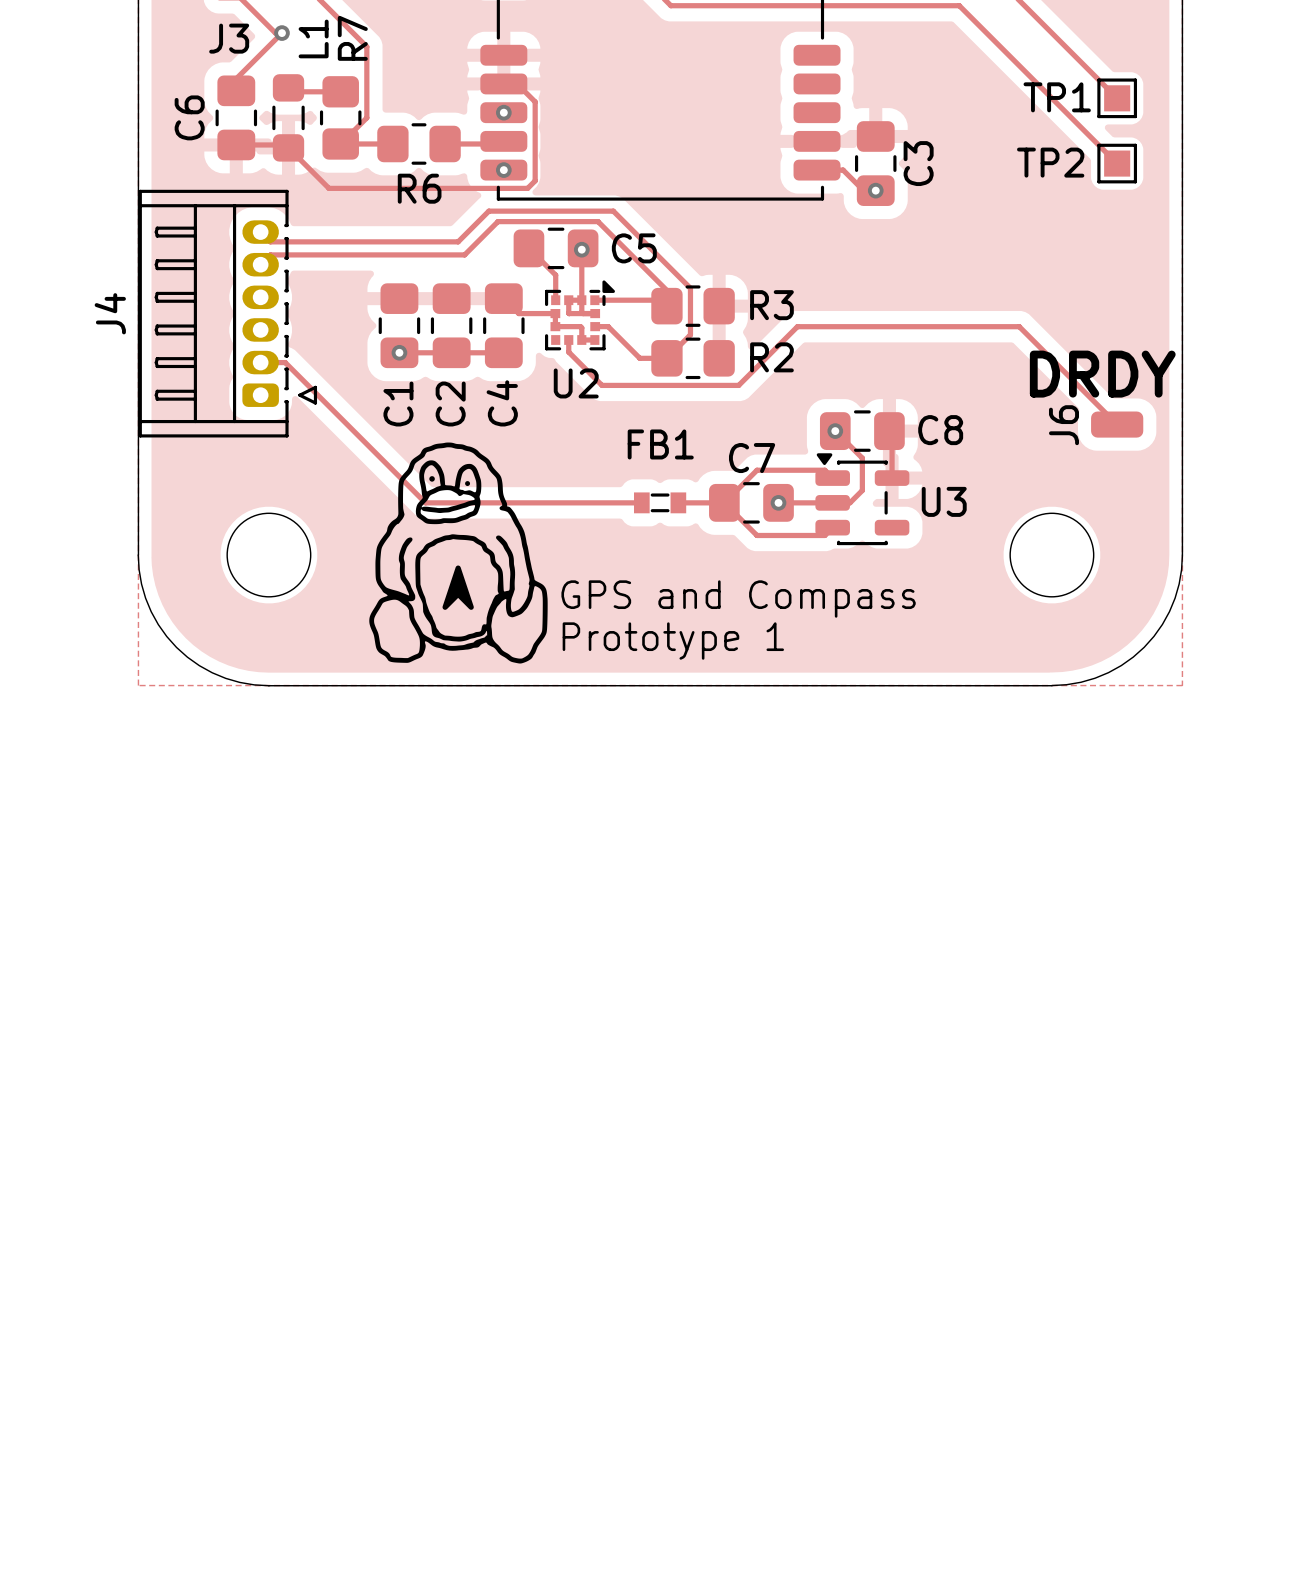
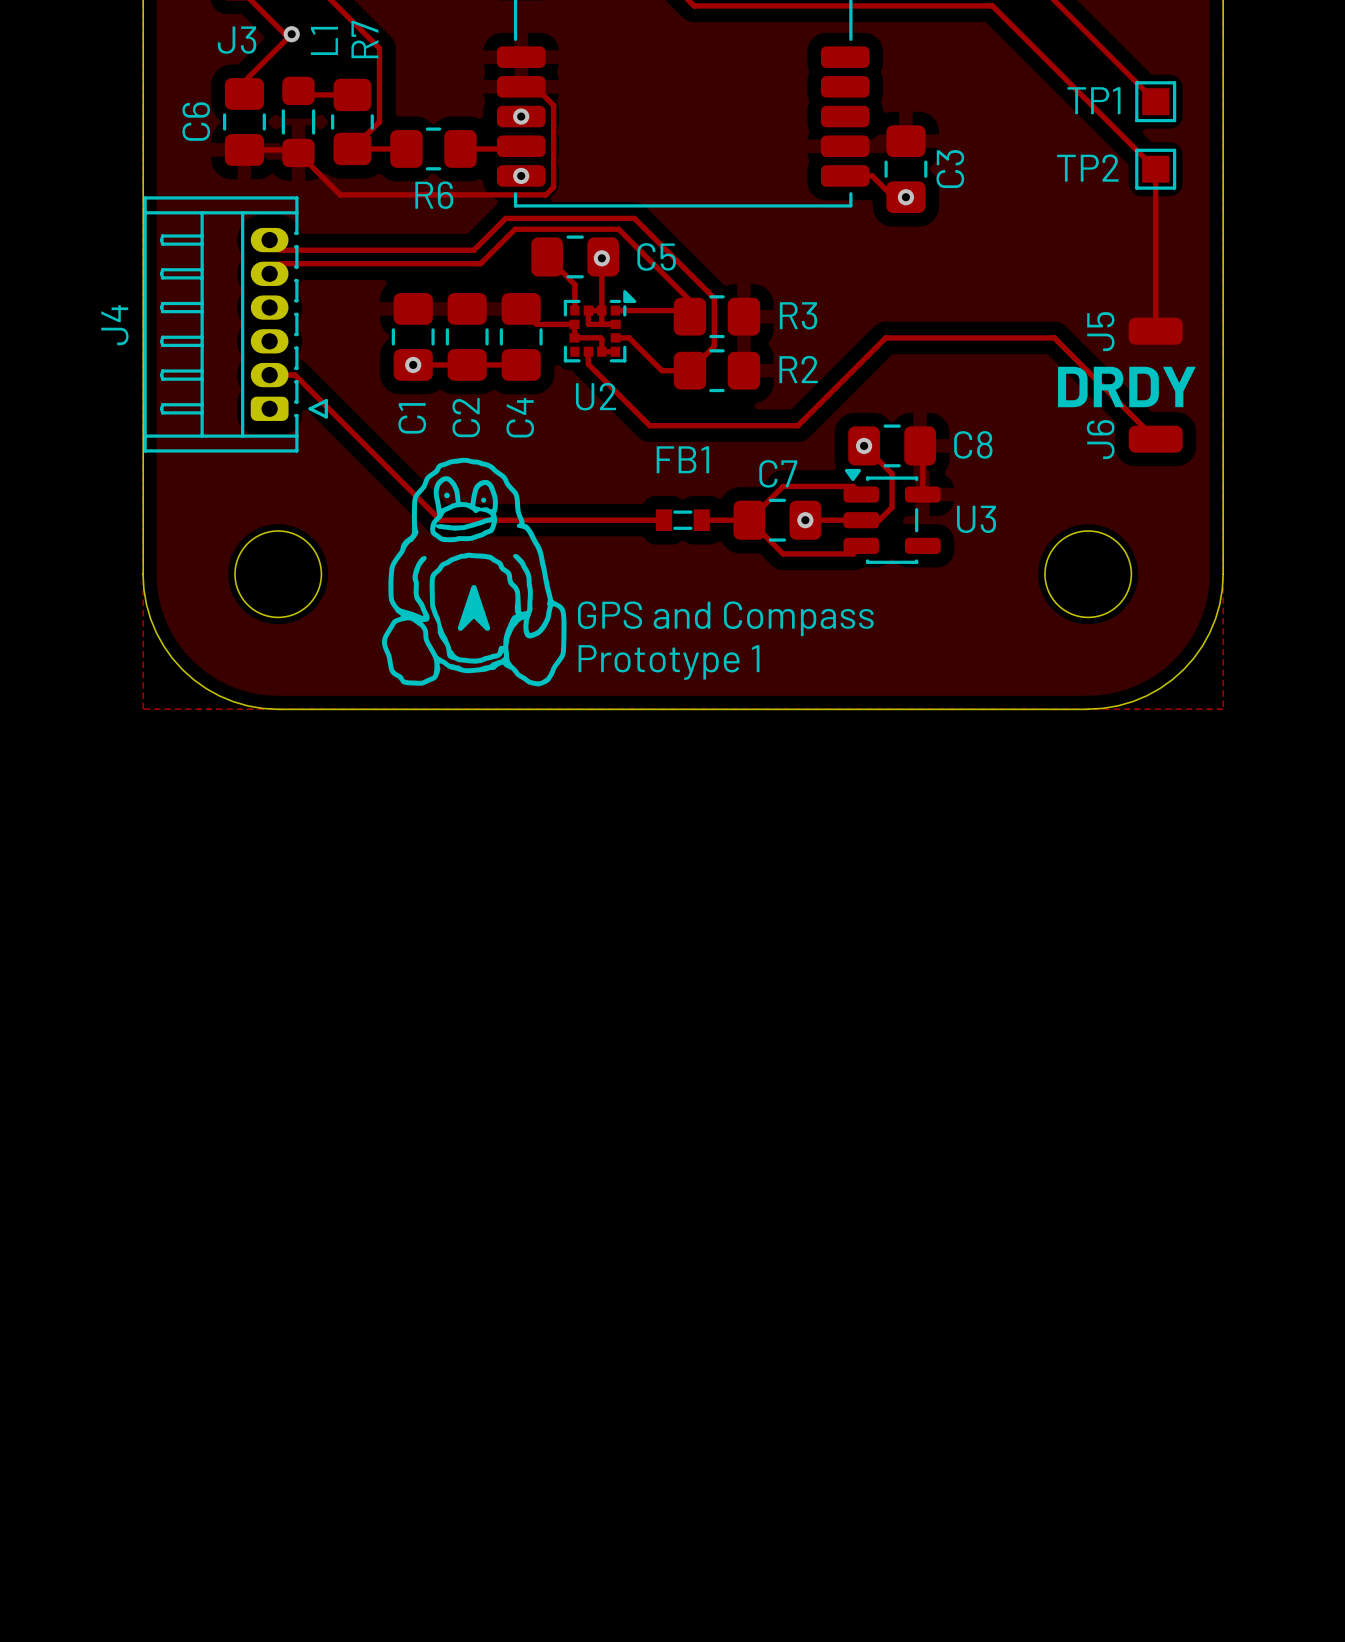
track: none -> (1155, 169) (1155, 331)
J5: none -> (1155, 331)
track: (856, 326) (797, 326) (738, 385) (602, 385) -> (885, 337) (797, 425) (649, 425) (622, 398)

